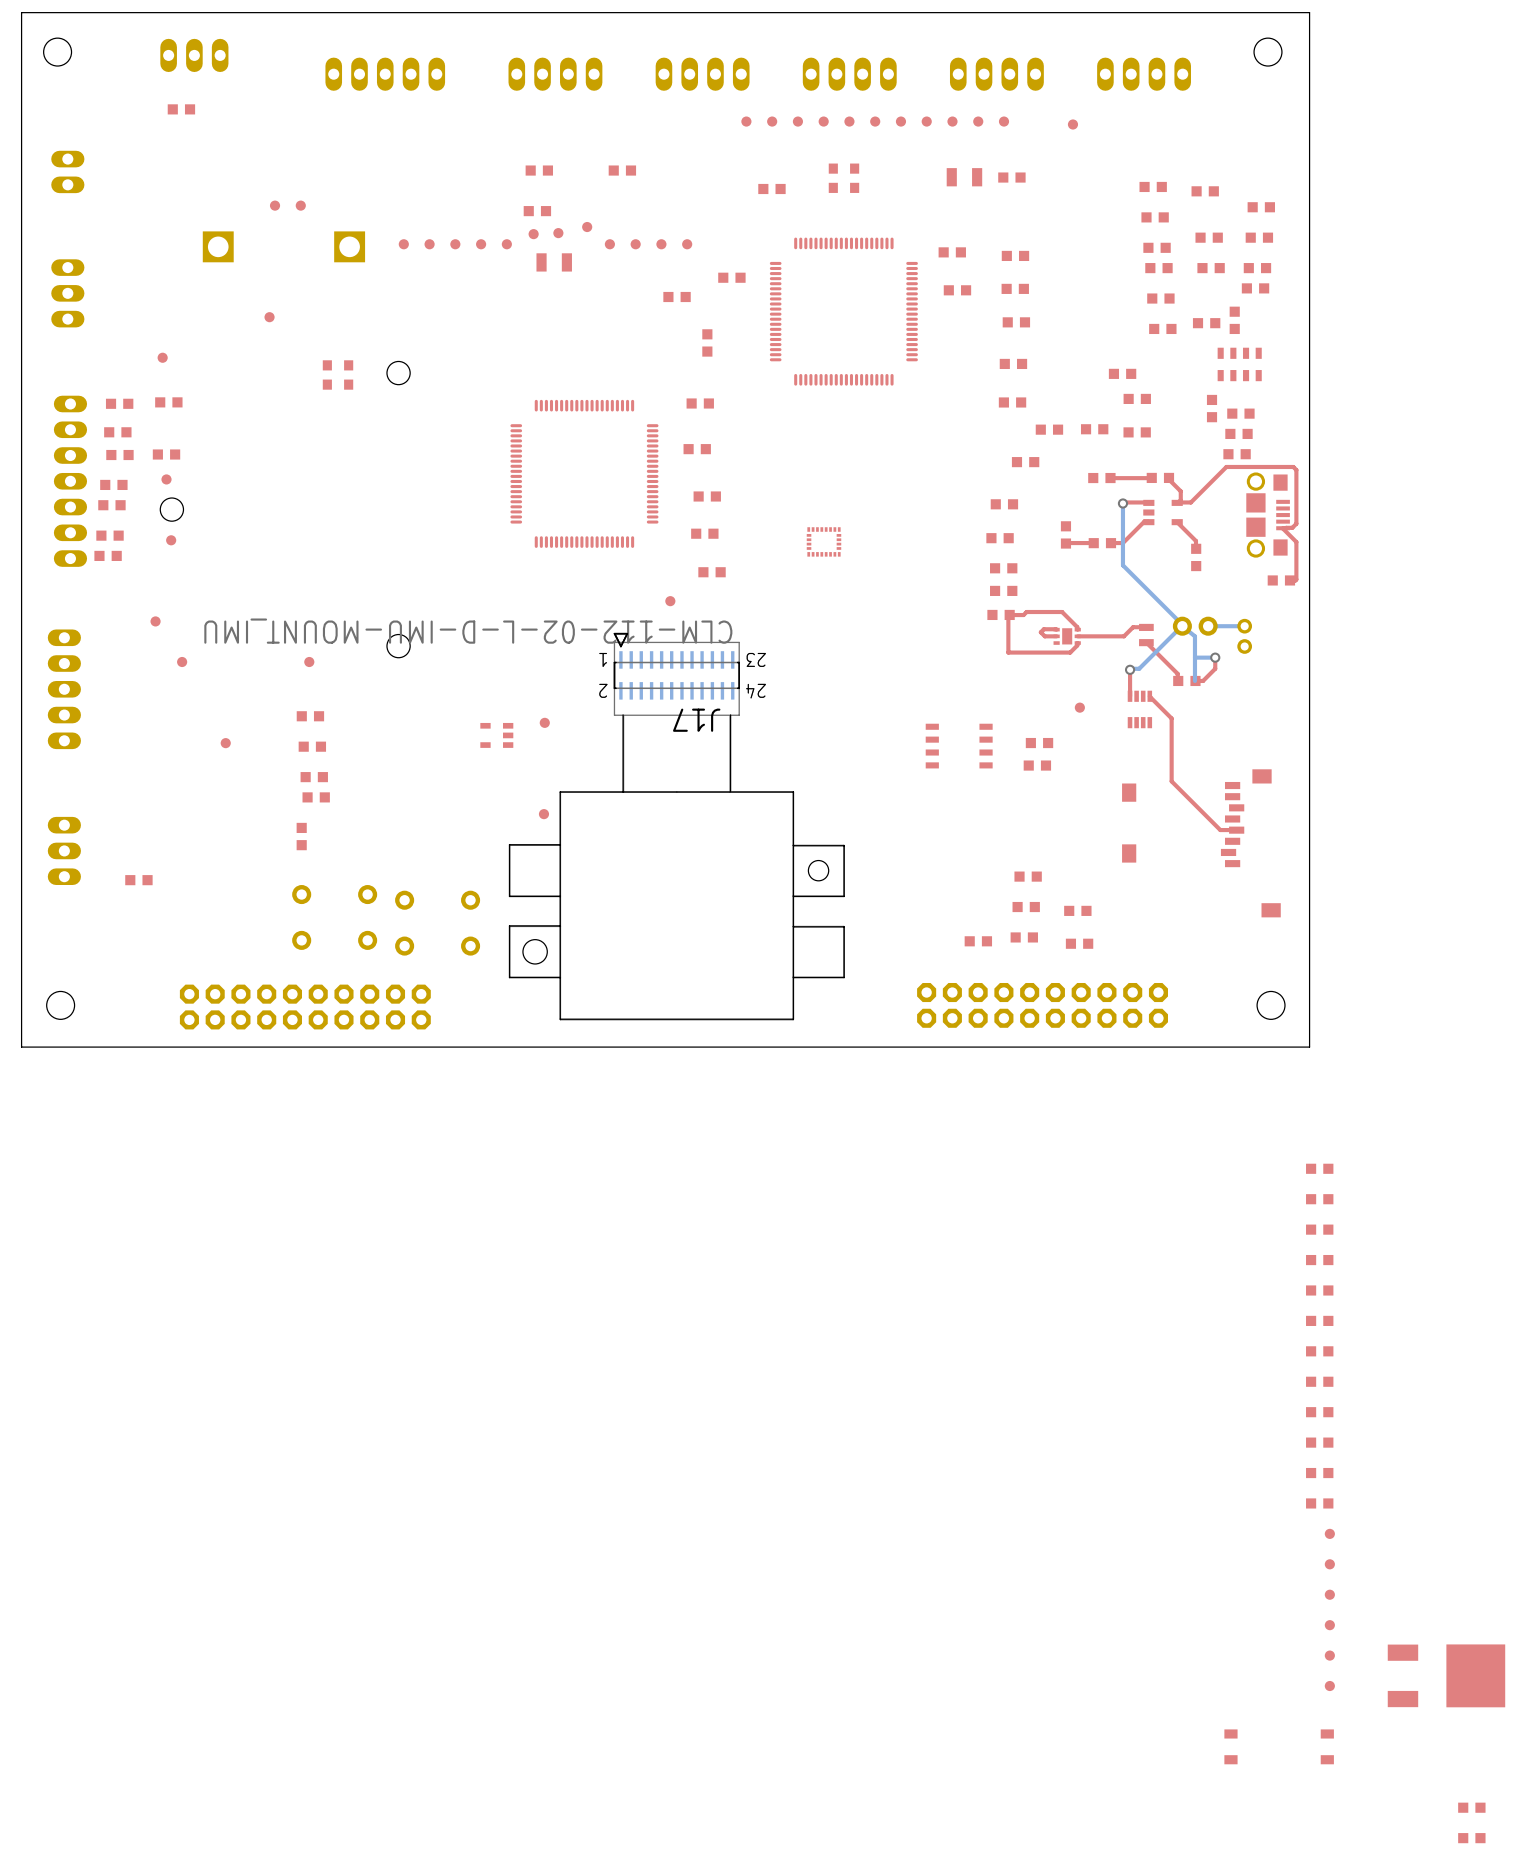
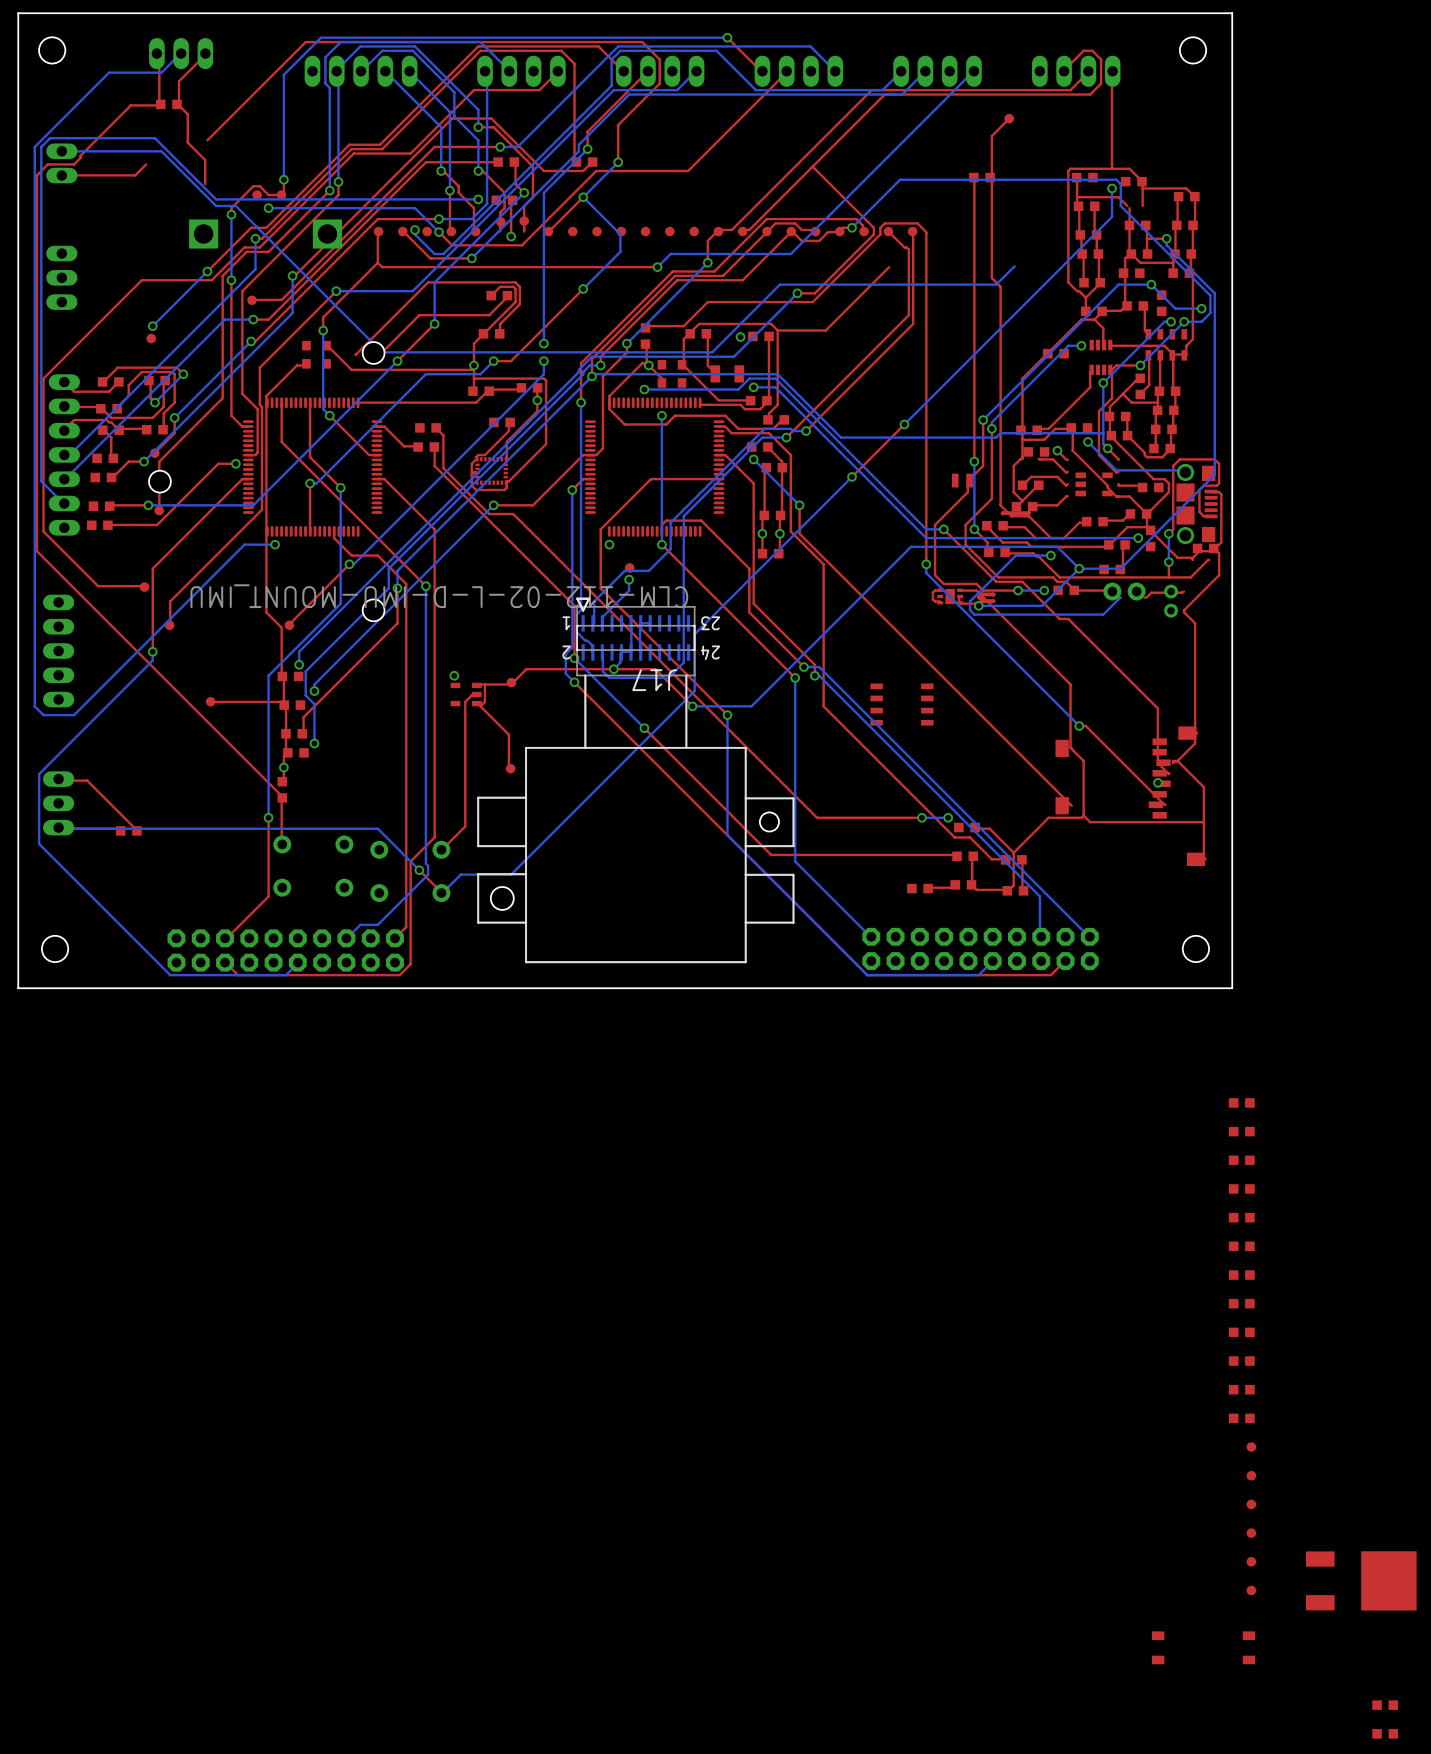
top track: none -> (727, 37) (762, 71)
bottom track: none -> (727, 37) (321, 37) (283, 74) (283, 179)
via: none -> (727, 37)
top track: none -> (156, 53) (159, 57) (160, 104) (130, 105) (74, 164) (47, 164) (36, 175) (36, 551) (281, 795) (281, 844)
bottom track: none -> (181, 53) (161, 72) (109, 72) (34, 146) (34, 706) (43, 715) (74, 715) (244, 544) (275, 544)
top track: none -> (205, 53) (179, 81) (179, 103) (177, 104) (187, 114) (187, 142) (205, 160) (205, 184)
bottom track: none -> (361, 71) (382, 50) (412, 50) (454, 92) (454, 116) (478, 140) (478, 170)
bottom track: none -> (385, 71) (441, 127) (441, 170)
bottom track: none -> (409, 71) (449, 112) (449, 190)
bottom track: none -> (485, 71) (487, 72) (487, 203) (471, 219) (439, 219)
bottom track: none -> (509, 71) (480, 42) (340, 42) (325, 57) (325, 83) (329, 87) (329, 190)
top track: none -> (557, 71) (539, 90) (473, 90) (410, 153) (353, 153) (259, 247) (244, 247) (211, 280) (141, 280) (43, 378) (43, 531) (98, 586) (144, 587)
top track: none -> (623, 71) (598, 46) (478, 46) (380, 144) (349, 144) (266, 227) (251, 227) (207, 271)
top track: none -> (648, 71) (587, 131) (587, 149)
bottom track: none -> (696, 71) (677, 90) (613, 90) (412, 291) (336, 291)
top track: none -> (786, 71) (688, 170) (596, 170) (522, 245) (452, 245) (439, 232)
bottom track: none -> (835, 71) (810, 46) (618, 46) (517, 146) (500, 146)
bottom track: none -> (901, 71) (882, 90) (755, 90) (716, 50) (620, 50) (611, 59) (611, 85) (443, 254) (434, 254) (414, 234) (414, 229)
bottom track: none -> (925, 71) (902, 94) (629, 94) (578, 144) (578, 151) (471, 258)
bottom track: none -> (973, 71) (790, 254) (670, 254) (657, 267)
top track: none -> (1064, 71) (1083, 50) (1092, 50) (1101, 59) (1101, 83) (1090, 94) (884, 94) (749, 229) (742, 229) (742, 231)
top track: none -> (1088, 71) (1070, 90) (871, 90) (731, 229) (718, 229) (707, 240) (707, 262)
top track: none -> (1112, 71) (1112, 168)
part: (746, 121) -> none
part: (772, 121) -> none
part: (797, 121) -> none
part: (823, 121) -> none
part: (849, 121) -> none
part: (875, 121) -> none
part: (900, 121) -> none
part: (926, 121) -> none
part: (952, 121) -> none
part: (978, 121) -> none
part: (1004, 121) -> none
top track: none -> (1009, 118) (991, 136) (991, 177) (990, 177) (991, 179) (991, 278) (1000, 286) (1000, 505) (1011, 516) (1029, 516) (1050, 538) (1063, 538) (1079, 522) (1086, 521)
top track: none -> (478, 127) (493, 127) (532, 166) (532, 197) (524, 205) (524, 231)
bottom track: none -> (478, 127) (478, 109) (414, 46) (360, 46) (336, 70) (338, 72) (338, 181)
via: none -> (478, 127)
top track: none -> (207, 140) (305, 42) (642, 42) (659, 59) (659, 83) (618, 125) (618, 162)
top track: none -> (500, 146) (434, 146) (281, 299) (251, 300)
via: none -> (500, 146)
bottom track: none -> (587, 149) (543, 192) (543, 343)
via: none -> (587, 149)
bottom track: none -> (61, 151) (161, 151) (216, 205) (235, 205) (382, 352) (712, 352) (779, 284) (996, 284) (1014, 266)
top track: none -> (498, 162) (425, 162) (268, 319) (253, 319)
top track: none -> (514, 162) (515, 184) (524, 192)
top track: none -> (576, 162) (574, 160) (574, 63) (561, 50) (480, 50) (382, 149) (351, 149) (262, 238) (255, 238)
top track: none -> (592, 162) (583, 170) (543, 170) (491, 118) (452, 118) (294, 275) (292, 275)
bottom track: none -> (618, 162) (583, 197) (620, 234) (620, 251) (583, 288)
via: none -> (618, 162)
top track: none -> (146, 164) (135, 175) (61, 175)
top track: none -> (812, 166) (873, 227) (873, 234) (814, 293) (797, 293)
part: (964, 177) -> none
part position: (1011, 177) -> (981, 177)
part position: (843, 178) -> (672, 373)
top track: none -> (441, 170) (458, 186) (458, 192) (473, 208) (473, 229) (475, 231)
via: none -> (441, 170)
top track: none -> (478, 170) (482, 170) (504, 192) (504, 208) (500, 212) (499, 231)
via: none -> (478, 170)
top track: none -> (973, 177) (974, 461)
top track: none -> (1076, 177) (1079, 234) (1081, 236) (1081, 251) (1083, 254) (1083, 282)
part: (771, 188) -> none
top track: none -> (283, 179) (283, 192) (281, 195) (268, 195) (259, 186) (253, 186) (231, 208) (231, 214)
via: none -> (283, 179)
top track: none -> (338, 181) (338, 195) (242, 291) (242, 393) (257, 409) (257, 452) (255, 455) (248, 455)
via: none -> (338, 181)
bottom track: none -> (1112, 188) (1112, 216) (904, 424)
via: none -> (1112, 188)
top track: none -> (1142, 188) (1186, 188) (1195, 197) (1195, 223) (1192, 225) (1192, 251) (1190, 254) (1189, 273) (1192, 275) (1192, 339) (1186, 345) (1186, 354) (1173, 354)
top track: none -> (329, 190) (268, 251) (246, 251) (222, 275) (222, 398) (159, 461) (159, 510)
via: none -> (329, 190)
top track: none -> (449, 190) (451, 231)
via: none -> (449, 190)
bottom track: none -> (524, 192) (434, 282) (434, 323)
via: none -> (524, 192)
top track: none -> (583, 197) (550, 229)
via: none -> (583, 197)
top track: none -> (1077, 197) (1118, 197) (1127, 205)
top track: none -> (1178, 196) (1173, 273)
bottom track: none -> (478, 199) (216, 199) (154, 138) (50, 138) (41, 146) (41, 481) (64, 503)
via: none -> (478, 199)
top track: none -> (512, 200) (511, 236)
top track: none -> (1094, 206) (1094, 234) (1096, 234) (1096, 251) (1098, 254) (1100, 282) (1085, 297)
top track: none -> (1142, 205) (1142, 181) (1129, 168) (1070, 168) (1068, 170) (1068, 282) (1085, 297)
bottom track: none -> (268, 208) (414, 208) (439, 232)
via: none -> (268, 208)
top track: none -> (1129, 208) (1129, 251) (1131, 254)
bottom track: none -> (231, 214) (231, 280)
via: none -> (231, 214)
part position: (587, 227) -> (548, 231)
top track: none -> (439, 219) (377, 219) (255, 341) (251, 341)
via: none -> (439, 219)
top track: none -> (1145, 225) (1147, 254)
top track: none -> (852, 227) (843, 227) (838, 232) (827, 232) (819, 240) (801, 240) (791, 231) (742, 280) (677, 280) (600, 356) (600, 365)
bottom track: none -> (852, 227) (900, 179) (1116, 179) (1120, 184) (1120, 205) (1210, 295) (1210, 313) (1201, 321) (1184, 321) (1140, 365)
via: none -> (852, 227)
via: none -> (414, 229)
top track: none -> (378, 231) (377, 262)
top track: none -> (402, 231) (430, 258) (471, 258)
via: none -> (439, 232)
part: none -> (669, 231)
part: none -> (694, 231)
part: none -> (718, 231)
part: none -> (742, 231)
part: none -> (767, 231)
part: none -> (791, 231)
top track: none -> (815, 231) (801, 229) (795, 223) (775, 223) (723, 275) (675, 275) (591, 358) (591, 376)
part: none -> (815, 231)
part: none -> (839, 231)
top track: none -> (864, 231) (862, 225) (856, 219) (766, 219) (714, 271) (672, 271) (581, 363) (581, 402)
part: none -> (864, 231)
top track: none -> (888, 231) (908, 249) (908, 315) (786, 437)
part: none -> (888, 231)
top track: none -> (912, 231) (913, 323) (806, 431)
part: none -> (912, 231)
via: none -> (511, 236)
bottom track: none -> (255, 238) (255, 269) (71, 452) (65, 452) (64, 454)
via: none -> (255, 238)
top track: none -> (1166, 238) (1147, 238)
bottom track: none -> (1166, 238) (1166, 245) (1214, 293) (1214, 474) (1120, 568) (1079, 568)
via: none -> (1166, 238)
part: (952, 252) -> none
part: (1015, 255) -> none
part: (554, 262) -> none
top track: none -> (1131, 254) (1125, 258) (1123, 273) (1125, 273) (1125, 304) (1127, 305) (1120, 310) (1103, 310) (1094, 319)
top track: none -> (1131, 254) (1140, 262) (1173, 262)
via: none -> (471, 258)
top track: none -> (377, 262) (323, 317) (323, 330)
top track: none -> (377, 262) (382, 267) (657, 267)
part: (731, 277) -> none
bottom track: none -> (707, 262) (626, 343)
via: none -> (707, 262)
via: none -> (657, 267)
top track: none -> (889, 267) (825, 330) (777, 330)
bottom track: none -> (207, 271) (152, 326)
via: none -> (207, 271)
part: (1015, 288) -> none
part: none -> (1131, 273)
part: (957, 290) -> none
bottom track: none -> (292, 275) (292, 313) (144, 461)
via: none -> (292, 275)
top track: none -> (231, 280) (231, 415) (242, 426) (248, 426)
via: none -> (231, 280)
part: (677, 297) -> none
via: none -> (1151, 284)
top track: none -> (583, 288) (511, 361) (493, 361)
via: none -> (583, 288)
top track: none -> (336, 291) (259, 367) (259, 404) (262, 406) (262, 509) (170, 601) (169, 625)
via: none -> (336, 291)
bottom track: none -> (797, 293) (734, 356) (591, 356) (299, 651) (299, 664)
via: none -> (797, 293)
part: (843, 311) -> none
top track: none -> (491, 295) (500, 286) (513, 286) (515, 288) (515, 302) (473, 343) (472, 391)
part: none -> (499, 295)
top track: none -> (507, 295) (489, 315) (419, 315) (379, 354)
top track: none -> (1085, 297) (1085, 311)
part: (1016, 322) -> none
top track: none -> (1143, 305) (1144, 330) (1148, 334)
bottom track: none -> (1201, 308) (1175, 308) (1151, 284) (1118, 284) (983, 420)
via: none -> (1201, 308)
bottom track: none -> (253, 319) (224, 319) (64, 479)
via: none -> (253, 319)
top track: none -> (1094, 319) (1081, 319) (1022, 378) (1022, 458) (1013, 465) (1013, 492) (1022, 500)
top track: none -> (1094, 319) (1103, 328) (1104, 345)
bottom track: none -> (1171, 321) (1164, 321) (1103, 382) (1103, 444) (1107, 448)
via: none -> (1171, 321)
via: none -> (1184, 321)
top track: none -> (434, 323) (397, 361)
via: none -> (434, 323)
part: (707, 342) -> none
via: none -> (152, 326)
top track: none -> (645, 327) (646, 326) (683, 326) (707, 302) (812, 302) (880, 234) (880, 227) (884, 223) (917, 223) (926, 232) (926, 564)
bottom track: none -> (323, 330) (323, 409) (329, 415)
via: none -> (323, 330)
top track: none -> (777, 330) (777, 404) (768, 413) (767, 419)
top track: none -> (777, 330) (771, 323) (699, 323) (683, 339) (683, 363) (682, 364) (718, 400) (750, 400)
part: none -> (491, 333)
top track: none -> (499, 333) (500, 323) (519, 304) (519, 286) (515, 282) (428, 282) (355, 354)
part: none -> (698, 333)
top track: none -> (706, 333) (707, 365) (715, 373)
part: none -> (645, 336)
part: none -> (760, 336)
top track: none -> (769, 336) (768, 400) (760, 409) (744, 409) (740, 404) (701, 404) (700, 402)
via: none -> (740, 337)
bottom track: none -> (251, 341) (174, 417)
via: none -> (251, 341)
via: none -> (543, 343)
top track: none -> (626, 343) (626, 352) (602, 376) (602, 448) (596, 455) (583, 455) (532, 505) (493, 505)
via: none -> (626, 343)
top track: none -> (645, 344) (646, 363)
part: (1013, 363) -> none
top track: none -> (1110, 345) (1164, 345) (1173, 354)
top track: none -> (326, 345) (351, 369) (473, 369)
bottom track: none -> (1081, 345) (1068, 345) (991, 422) (991, 428)
via: none -> (1081, 345)
top track: none -> (1173, 354) (1175, 409) (1173, 411) (1171, 448)
top track: none -> (1148, 355) (1149, 385) (1140, 394)
top track: none -> (1160, 355) (1160, 389) (1157, 391) (1157, 409) (1155, 411) (1155, 448) (1153, 448)
part: none -> (1101, 357)
bottom track: none -> (397, 361) (253, 505) (148, 505)
via: none -> (397, 361)
bottom track: none -> (493, 361) (480, 374) (425, 374) (316, 483) (310, 483)
via: none -> (493, 361)
bottom track: none -> (543, 361) (543, 374) (353, 564) (349, 564)
via: none -> (543, 361)
top track: none -> (306, 363) (296, 365) (266, 396) (266, 612) (281, 627) (281, 675) (283, 677) (284, 705)
top track: none -> (646, 363) (661, 378) (661, 382)
top track: none -> (646, 363) (642, 363) (609, 396) (609, 409) (624, 424) (666, 424) (675, 415) (725, 415) (738, 428) (773, 428) (784, 419)
via: none -> (473, 365)
bottom track: none -> (600, 365) (589, 365) (388, 568) (388, 588) (305, 671) (305, 695) (314, 704) (314, 743)
via: none -> (600, 365)
via: none -> (648, 365)
top track: none -> (1140, 365) (1116, 365) (1110, 369) (1112, 372) (1112, 398) (1098, 411) (1098, 455) (1116, 472) (1118, 471)
via: none -> (1140, 365)
top track: none -> (1091, 369) (1090, 387) (1048, 428) (1037, 430)
top track: none -> (183, 374) (176, 367) (117, 367) (102, 381)
bottom track: none -> (183, 374) (154, 402)
via: none -> (183, 374)
part: none -> (727, 373)
via: none -> (591, 376)
part: (1137, 398) -> none
top track: none -> (1140, 378) (1109, 406) (1109, 435) (1153, 479) (1164, 479) (1168, 483) (1168, 492) (1147, 514)
top track: none -> (473, 378) (543, 378) (546, 380) (546, 444) (508, 481) (506, 481) (506, 487) (504, 490) (476, 490) (471, 485) (471, 463) (477, 459) (476, 457) (478, 455) (484, 455) (508, 431) (510, 422)
top track: none -> (148, 380) (150, 380) (150, 398) (154, 402)
top track: none -> (163, 380) (163, 406) (152, 417) (111, 417) (100, 406) (64, 406)
part: (1012, 402) -> none
top track: none -> (118, 381) (109, 391) (74, 391) (64, 382)
part: (700, 403) -> none
via: none -> (1103, 382)
bottom track: none -> (753, 387) (775, 387) (926, 538) (1138, 538)
via: none -> (753, 387)
top track: none -> (521, 387) (519, 389) (489, 389) (476, 402) (358, 402)
part: none -> (529, 387)
top track: none -> (537, 387) (537, 411) (506, 441) (506, 459)
bottom track: none -> (644, 389) (738, 389) (749, 378) (775, 378) (926, 529) (943, 529)
via: none -> (644, 389)
part: none -> (481, 391)
top track: none -> (1122, 393) (1131, 402) (1157, 402)
via: none -> (537, 400)
part: none -> (758, 400)
via: none -> (154, 402)
top track: none -> (281, 402) (281, 441) (425, 586)
top track: none -> (310, 402) (310, 457) (340, 487)
bottom track: none -> (581, 402) (581, 610) (576, 614) (576, 632) (591, 645) (592, 652)
via: none -> (581, 402)
part: (1049, 429) -> none
part: (1094, 429) -> none
top track: none -> (117, 408) (128, 396) (128, 385) (141, 372) (172, 372) (174, 374) (174, 402) (163, 413) (162, 429)
part: (1137, 432) -> none
top track: none -> (329, 415) (369, 455) (376, 455)
via: none -> (329, 415)
bottom track: none -> (661, 415) (661, 544)
via: none -> (661, 415)
part: none -> (1117, 416)
top track: none -> (1125, 416) (1127, 435) (1147, 457) (1162, 457) (1168, 450)
top track: none -> (174, 417) (174, 433) (154, 453)
via: none -> (174, 417)
part: none -> (776, 419)
top track: none -> (983, 420) (983, 465) (967, 481) (967, 492) (935, 524) (935, 575) (943, 583) (976, 583) (983, 590) (1018, 590)
via: none -> (983, 420)
part: none -> (502, 422)
top track: none -> (904, 424) (852, 476)
via: none -> (904, 424)
part: (697, 449) -> none
top track: none -> (376, 426) (384, 426) (404, 446) (418, 447)
top track: none -> (718, 426) (725, 426) (731, 433) (768, 433) (790, 455) (790, 531) (823, 564) (823, 706) (954, 837) (970, 837) (991, 859) (1005, 859)
part: none -> (428, 427)
top track: none -> (436, 427) (443, 435) (443, 468) (489, 514) (513, 514) (817, 817) (921, 817)
part: none -> (1079, 427)
top track: none -> (146, 428) (119, 430) (106, 420) (74, 420) (64, 430)
top track: none -> (991, 428) (991, 498) (965, 524) (965, 544) (998, 577) (1053, 577) (1057, 581) (1066, 581) (1074, 590) (1112, 590) (1120, 597)
via: none -> (991, 428)
top track: none -> (102, 430) (111, 437) (111, 457) (113, 458)
bottom track: none -> (806, 431) (764, 428) (670, 522) (670, 549) (648, 570) (624, 570) (594, 601) (592, 623)
via: none -> (806, 431)
part: none -> (1029, 430)
bottom track: none -> (1103, 433) (1000, 433) (996, 437) (841, 437) (777, 374) (594, 374) (397, 570) (397, 588)
part: none -> (1119, 435)
bottom track: none -> (786, 437) (762, 437) (683, 516) (683, 662) (668, 677) (609, 677) (602, 671) (602, 652)
via: none -> (786, 437)
part: (1025, 462) -> none
top track: none -> (1022, 439) (1044, 439) (1055, 428) (1071, 427) (1072, 450) (1116, 496) (1129, 496) (1147, 514)
bottom track: none -> (1088, 441) (1116, 470) (1184, 470) (1185, 472)
via: none -> (1088, 441)
part: none -> (426, 447)
top track: none -> (434, 447) (434, 465) (574, 605) (574, 658)
part: none -> (759, 447)
top track: none -> (767, 447) (782, 461) (779, 553)
part position: (584, 473) -> (654, 467)
top track: none -> (1107, 448) (1118, 459)
via: none -> (1107, 448)
part: none -> (1162, 448)
top track: none -> (1057, 450) (1067, 459)
via: none -> (1057, 450)
top track: (1151, 477) (1110, 478) -> none
part: (1160, 477) -> none
top track: (1169, 477) (1180, 491) (1180, 500) (1177, 502) (1190, 502) (1226, 466) (1293, 466) (1296, 470) (1296, 523) (1292, 527) (1283, 528) (1296, 542) (1296, 579) (1290, 580) -> none
top track: none -> (718, 455) (725, 455) (753, 483) (753, 603) (814, 664) (814, 675)
top track: none -> (1038, 458) (1053, 459) (1066, 472) (1067, 471)
bottom track: none -> (753, 459) (799, 505)
via: none -> (753, 459)
top track: none -> (144, 461) (128, 461) (111, 477)
via: none -> (144, 461)
bottom track: none -> (974, 461) (974, 529)
via: none -> (974, 461)
top track: none -> (235, 463) (218, 463) (157, 524) (107, 525)
via: none -> (235, 463)
part: none -> (312, 467)
top track: none -> (766, 467) (764, 468) (764, 514) (762, 516) (762, 553)
part: none -> (774, 467)
part: (707, 496) -> none
part: none -> (491, 471)
top track: none -> (477, 473) (471, 474)
top track: (1148, 502) (1122, 503) -> none
bottom track: (1122, 503) (1122, 565) (1182, 626) -> none
via: (1122, 503) -> none
bottom track: none -> (852, 476) (694, 634) (694, 691) (511, 874) (460, 874) (443, 892)
via: none -> (852, 476)
part: (1004, 504) -> none
top track: none -> (248, 479) (242, 479) (152, 568) (152, 651)
top track: none -> (376, 479) (384, 479) (434, 529) (434, 837) (410, 861) (410, 964) (399, 975) (237, 975) (227, 964)
top track: none -> (590, 479) (583, 479) (572, 490)
top track: none -> (718, 479) (650, 479) (600, 529) (600, 588) (727, 715)
top track: none -> (310, 483) (310, 531)
via: none -> (310, 483)
top track: none -> (1067, 484) (1066, 485) (1057, 476) (1031, 476) (1022, 485)
top track: none -> (1118, 484) (1118, 485) (1140, 485) (1142, 487)
part: none -> (1030, 485)
top track: none -> (1038, 485) (1016, 506)
part: none -> (1150, 487)
part position: (1268, 515) -> (1196, 503)
bottom track: none -> (340, 487) (340, 603) (268, 675) (268, 817)
via: none -> (340, 487)
bottom track: none -> (572, 490) (572, 647) (565, 653) (565, 673) (574, 682)
via: none -> (572, 490)
top track: none -> (1211, 491) (1219, 492) (1221, 494) (1221, 542) (1212, 551) (1199, 551) (1192, 559) (1190, 557) (1177, 557) (1150, 530)
top track: (1148, 522) (1144, 521) (1122, 543) (1111, 543) -> none
top track: (1177, 522) (1195, 541) (1196, 548) -> none
top track: none -> (1067, 496) (1057, 505) (1032, 506)
part footprint: [806, 527, 842, 557] -> [759, 510, 786, 521]
part: (704, 533) -> none
top track: none -> (148, 505) (109, 506)
via: none -> (148, 505)
bottom track: none -> (493, 505) (314, 684) (314, 691)
via: none -> (493, 505)
top track: none -> (799, 505) (799, 533) (1071, 805)
via: none -> (799, 505)
part: (1065, 534) -> none
part: none -> (1024, 506)
part: (1000, 538) -> none
part: (1102, 543) -> none
top track: none -> (1130, 513) (1122, 520) (1103, 521)
part: none -> (1138, 513)
top track: none -> (1147, 514) (1147, 527)
top track: none -> (1211, 516) (1203, 516) (1199, 511) (1199, 490) (1203, 485) (1216, 485) (1219, 483) (1219, 463) (1214, 459) (1179, 459) (1173, 465) (1173, 529) (1168, 533)
part: none -> (1094, 521)
top track: none -> (986, 525) (1002, 542) (1026, 542) (1031, 546) (1063, 547) (1107, 546) (1127, 527) (1147, 527)
part: none -> (994, 525)
top track: none -> (1003, 525) (1024, 527) (1036, 538)
part: (1196, 557) -> none
top track: none -> (943, 529) (996, 581) (1022, 581) (1059, 618) (1068, 618) (1157, 708) (1157, 763) (1169, 773)
via: none -> (943, 529)
top track: none -> (974, 529) (987, 542) (988, 552)
via: none -> (974, 529)
top track: none -> (334, 531) (334, 538) (351, 555) (377, 555) (406, 583) (406, 927) (395, 937)
top track: none -> (661, 531) (661, 524) (666, 520) (701, 520) (749, 568) (749, 612) (803, 667)
via: none -> (762, 533)
via: none -> (779, 533)
bottom track: none -> (1168, 533) (1168, 562)
via: none -> (1168, 533)
part: (1003, 568) -> none
via: none -> (1138, 538)
part: none -> (1150, 538)
part: (712, 572) -> none
via: none -> (275, 544)
via: none -> (609, 544)
top track: none -> (661, 544) (795, 677)
via: none -> (661, 544)
part: none -> (1116, 544)
top track: none -> (1125, 544) (1122, 546) (1122, 566) (1120, 569)
top track: none -> (1214, 549) (1219, 553) (1219, 575) (1183, 610) (1195, 623) (1195, 732) (1196, 733) (1195, 734) (1195, 743) (1177, 760)
part: none -> (997, 552)
top track: none -> (1005, 552) (1033, 553) (1059, 577) (1190, 577) (1209, 559)
part: none -> (770, 553)
bottom track: none -> (1050, 555) (1015, 555) (970, 601) (970, 610) (974, 614) (1103, 614) (1120, 597)
via: none -> (1050, 555)
part: (1003, 590) -> none
top track: none -> (1168, 562) (1168, 577)
via: none -> (1168, 562)
top track: none -> (349, 564) (289, 625)
via: none -> (349, 564)
bottom track: none -> (926, 564) (926, 573) (1079, 726)
via: none -> (926, 564)
bottom track: none -> (1079, 568) (1042, 605) (978, 605)
bottom track: none -> (1079, 568) (1057, 546) (911, 546) (751, 706) (692, 706)
via: none -> (1079, 568)
part: none -> (1112, 569)
bottom track: none -> (629, 579) (629, 590) (602, 616) (602, 623)
via: none -> (629, 579)
part: (1001, 614) -> none
bottom track: none -> (425, 586) (425, 863) (428, 865) (428, 874) (377, 924) (360, 924) (347, 937)
via: none -> (425, 586)
top track: none -> (397, 588) (397, 623) (303, 717) (302, 733)
via: none -> (397, 588)
top track: none -> (940, 590) (932, 592) (932, 599) (940, 602)
top track: none -> (960, 590) (976, 590) (1070, 684) (1070, 747) (1083, 760) (1083, 815)
part: none -> (1066, 590)
via: none -> (1018, 590)
bottom track: none -> (1044, 590) (1018, 590)
via: none -> (1044, 590)
bottom track: (1182, 626) (1194, 636) (1194, 680) -> none
bottom track: (1182, 626) (1139, 668) (1130, 669) -> none
bottom track: (1244, 626) (1208, 626) -> none
top track: none -> (1183, 591) (1151, 592) (1144, 597)
top track: (1146, 627) (1133, 627) (1123, 636) (1077, 636) -> none
top track: (1077, 629) (1062, 612) (1026, 612) (1023, 615) (1008, 615) (1008, 652) (1070, 652) (1077, 643) -> none
top track: none -> (960, 596) (959, 601) (961, 603) (976, 603) (978, 605)
part rotation: 0° (1146, 635) -> 90° clockwise (962, 480)
part position: (1146, 635) -> (962, 480)
part position: (1067, 636) -> (950, 596)
via: none -> (978, 605)
top track: (1146, 642) (1177, 673) (1178, 680) -> none
top track: (1215, 657) (1215, 668) (1203, 680) (1195, 680) -> none
bottom track: (1215, 657) (1194, 657) -> none
via: (1215, 657) -> none
bottom track: none -> (631, 623) (631, 651)
bottom track: none -> (650, 623) (640, 623) (640, 652)
top track: (1130, 669) (1130, 696) -> none
via: (1130, 669) -> none
part: (1186, 680) -> none
bottom track: none -> (152, 651) (152, 660) (39, 774) (39, 844) (170, 975) (286, 975) (296, 964)
via: none -> (152, 651)
bottom track: none -> (631, 651) (621, 652) (620, 662) (613, 669)
top track: (1149, 696) (1171, 718) (1171, 781) (1220, 830) (1236, 830) -> none
bottom track: none -> (574, 658) (644, 728)
via: none -> (574, 658)
via: none -> (299, 664)
bottom track: none -> (803, 667) (819, 667) (1089, 936)
via: none -> (803, 667)
part: (1079, 707) -> none
via: none -> (613, 669)
part: (1139, 709) -> none
via: none -> (454, 675)
bottom track: none -> (814, 675) (819, 675) (1039, 896) (1041, 936)
via: none -> (814, 675)
bottom track: none -> (795, 677) (795, 861) (871, 936)
via: none -> (795, 677)
top track: none -> (574, 682) (867, 975) (1050, 975) (1065, 961)
via: none -> (574, 682)
top track: none -> (484, 684) (484, 701) (480, 706)
top track: none -> (476, 685) (511, 684) (526, 669) (655, 669) (692, 706)
via: none -> (314, 691)
top track: none -> (476, 694) (471, 695) (465, 701) (465, 826) (441, 849)
top track: none -> (210, 701) (283, 701) (284, 705)
part: (1039, 743) -> none
top track: none -> (476, 703) (508, 734) (508, 767) (510, 768)
top track: none -> (284, 705) (286, 706) (286, 752) (287, 752) (283, 756) (283, 780) (282, 781)
via: none -> (692, 706)
bottom track: none -> (727, 715) (727, 835) (867, 975) (978, 975) (992, 961)
via: none -> (727, 715)
part: (1037, 765) -> none
top track: none -> (1079, 726) (1085, 726) (1165, 804)
via: none -> (1079, 726)
top track: none -> (644, 728) (771, 854) (957, 856)
via: none -> (644, 728)
via: none -> (314, 743)
top track: none -> (1177, 760) (1173, 760) (1173, 762) (1177, 760)
top track: none -> (1177, 760) (1203, 787) (1203, 857) (1205, 859)
via: none -> (283, 767)
top track: none -> (58, 779) (58, 780) (87, 780) (136, 830)
via: none -> (1157, 782)
top track: none -> (1083, 815) (1081, 817) (1048, 817) (1013, 852)
top track: none -> (1083, 815) (1090, 822) (1203, 822)
top track: none -> (268, 817) (268, 896) (227, 937)
via: none -> (268, 817)
via: none -> (921, 817)
bottom track: none -> (948, 817) (921, 817)
via: none -> (948, 817)
bottom track: none -> (58, 827) (377, 828) (419, 870)
top track: none -> (975, 827) (989, 828) (1013, 852)
top track: none -> (1013, 852) (1013, 885) (1007, 890) (976, 889) (971, 884) (973, 856)
top track: none -> (1021, 859) (1023, 890)
top track: none -> (419, 870) (441, 892)
via: none -> (419, 870)
top track: none -> (955, 884) (952, 887) (928, 888)

